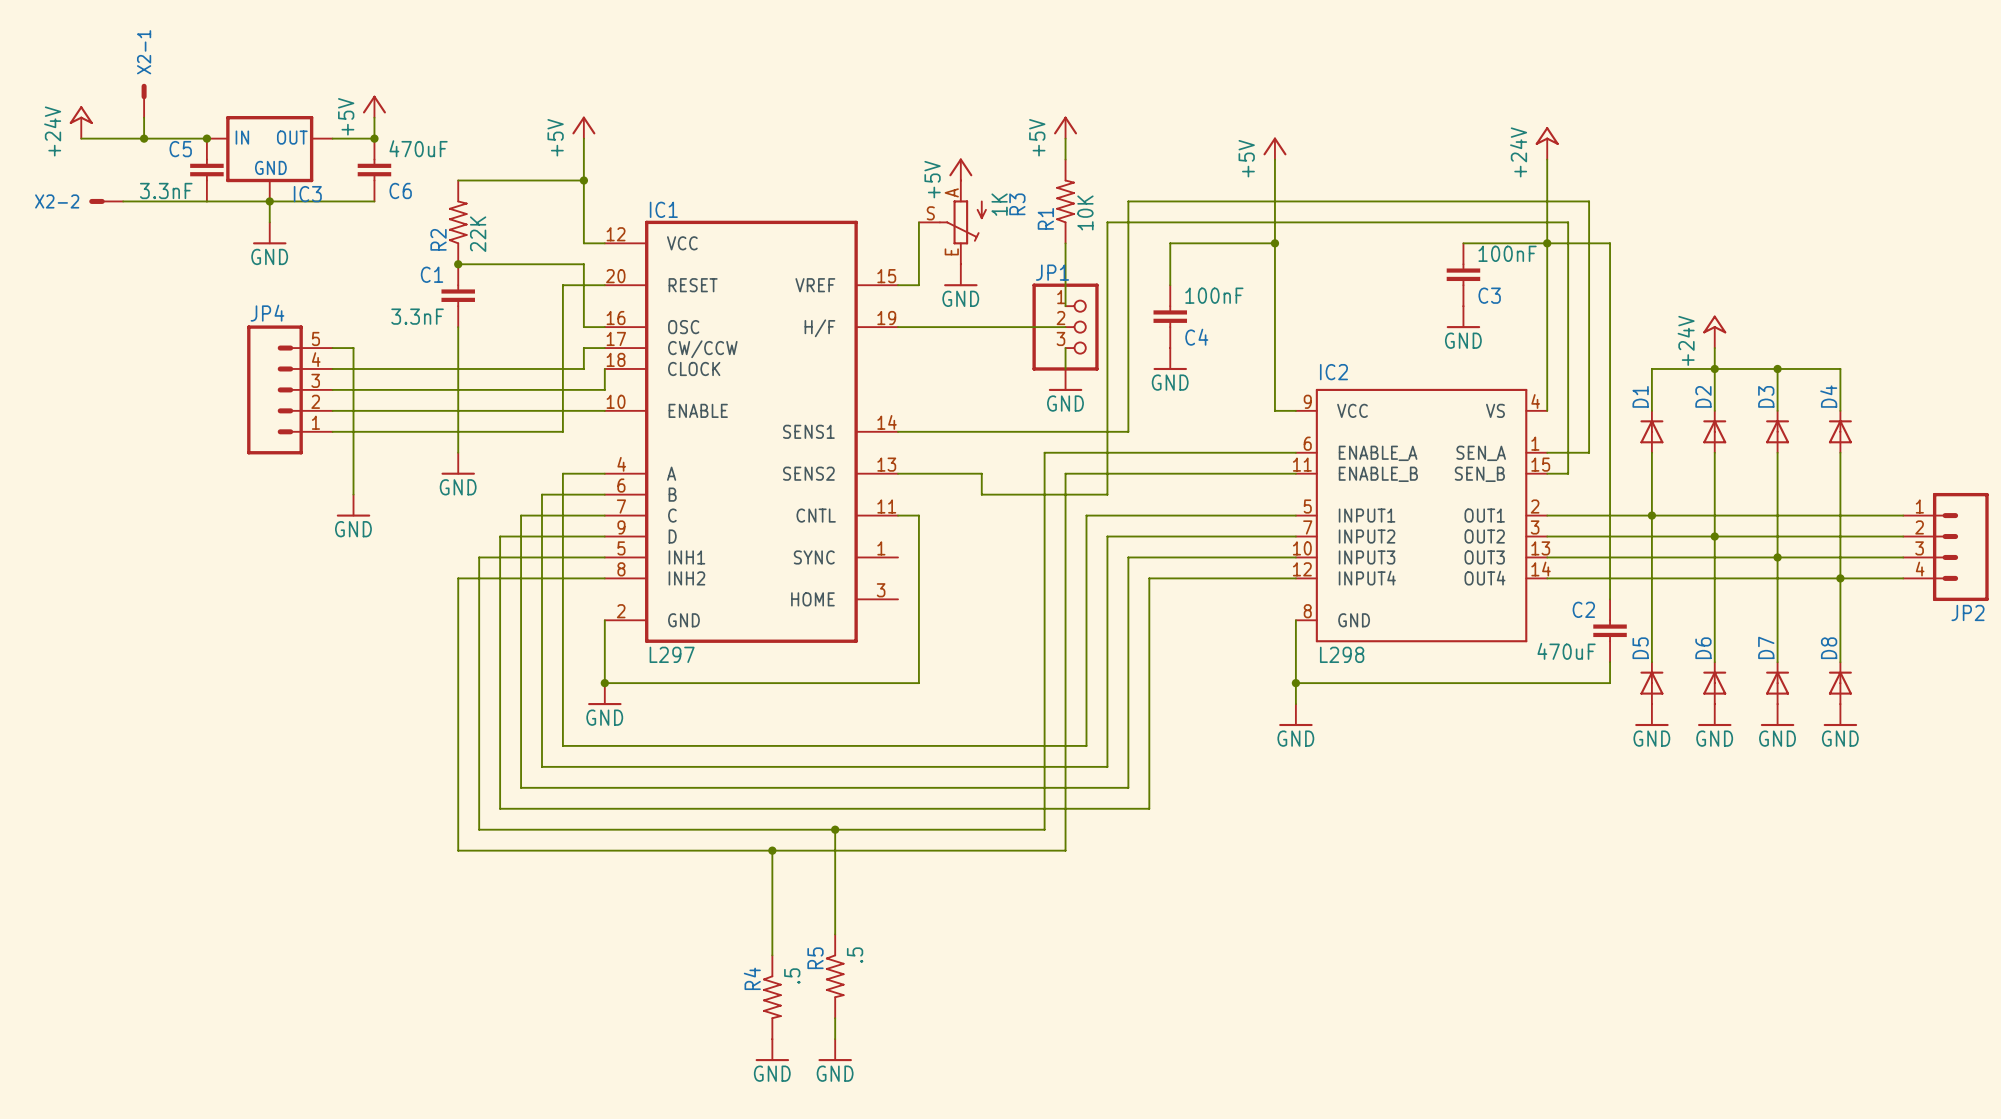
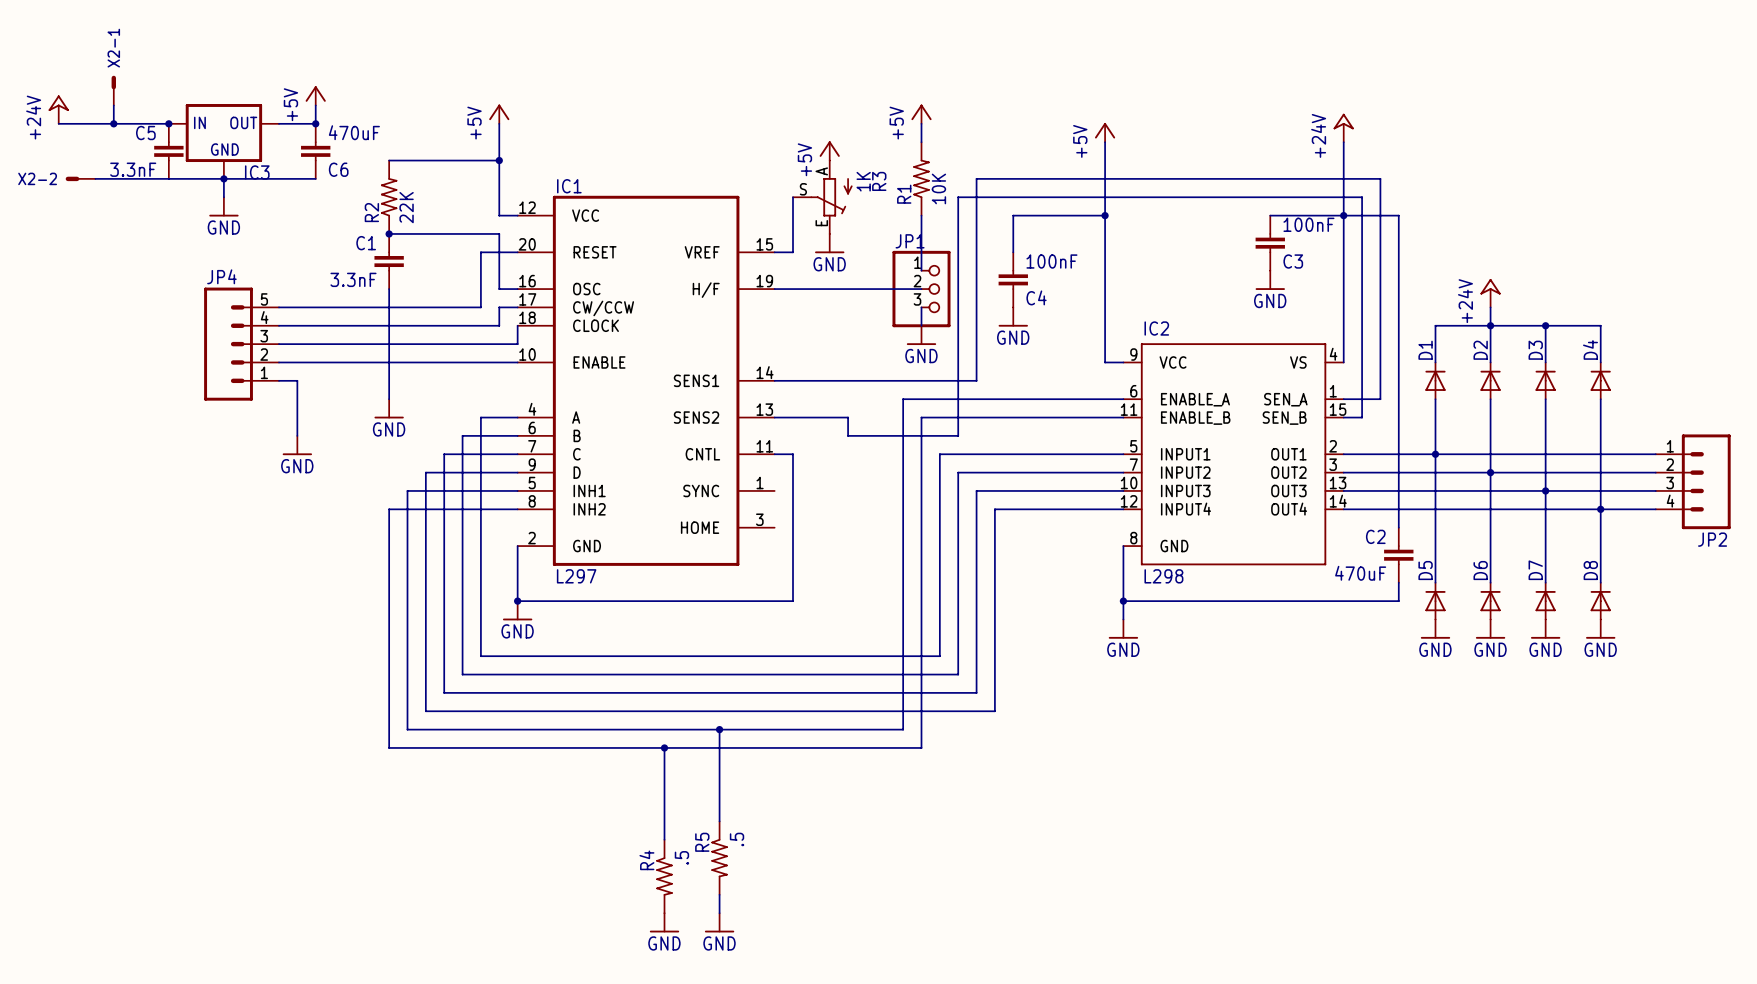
wire: (353, 348) (353, 431) (562, 431) (562, 348) -> (297, 307) (480, 307)

